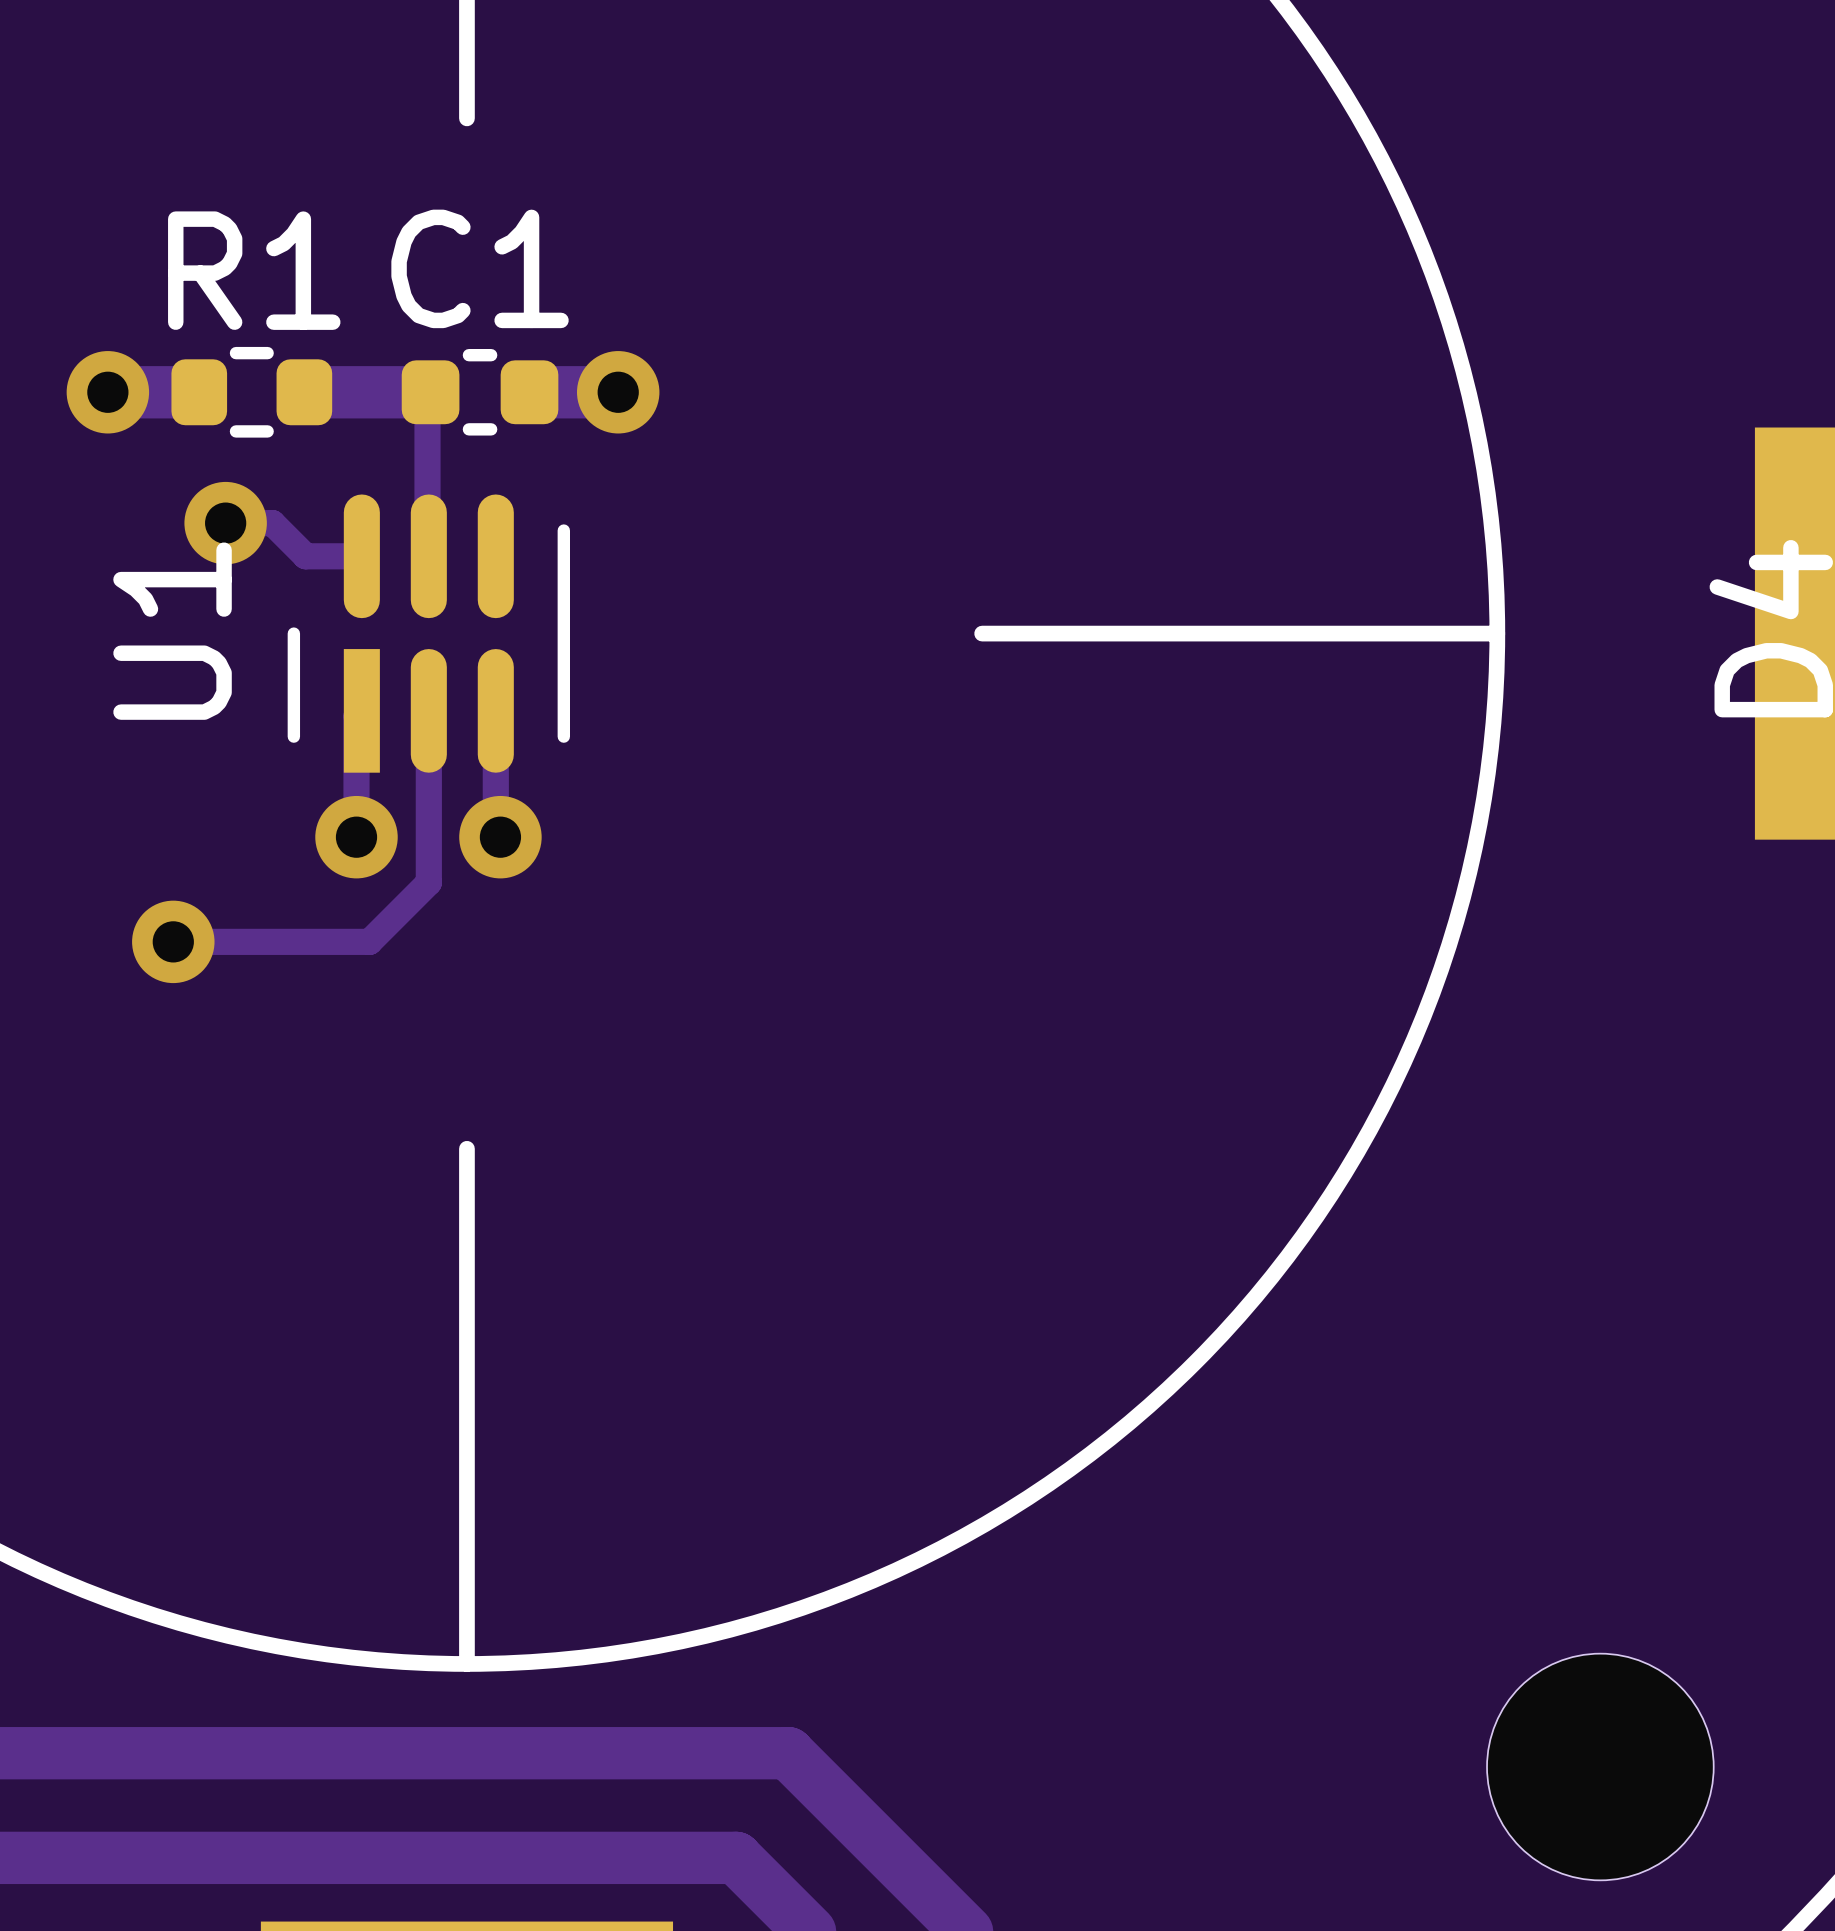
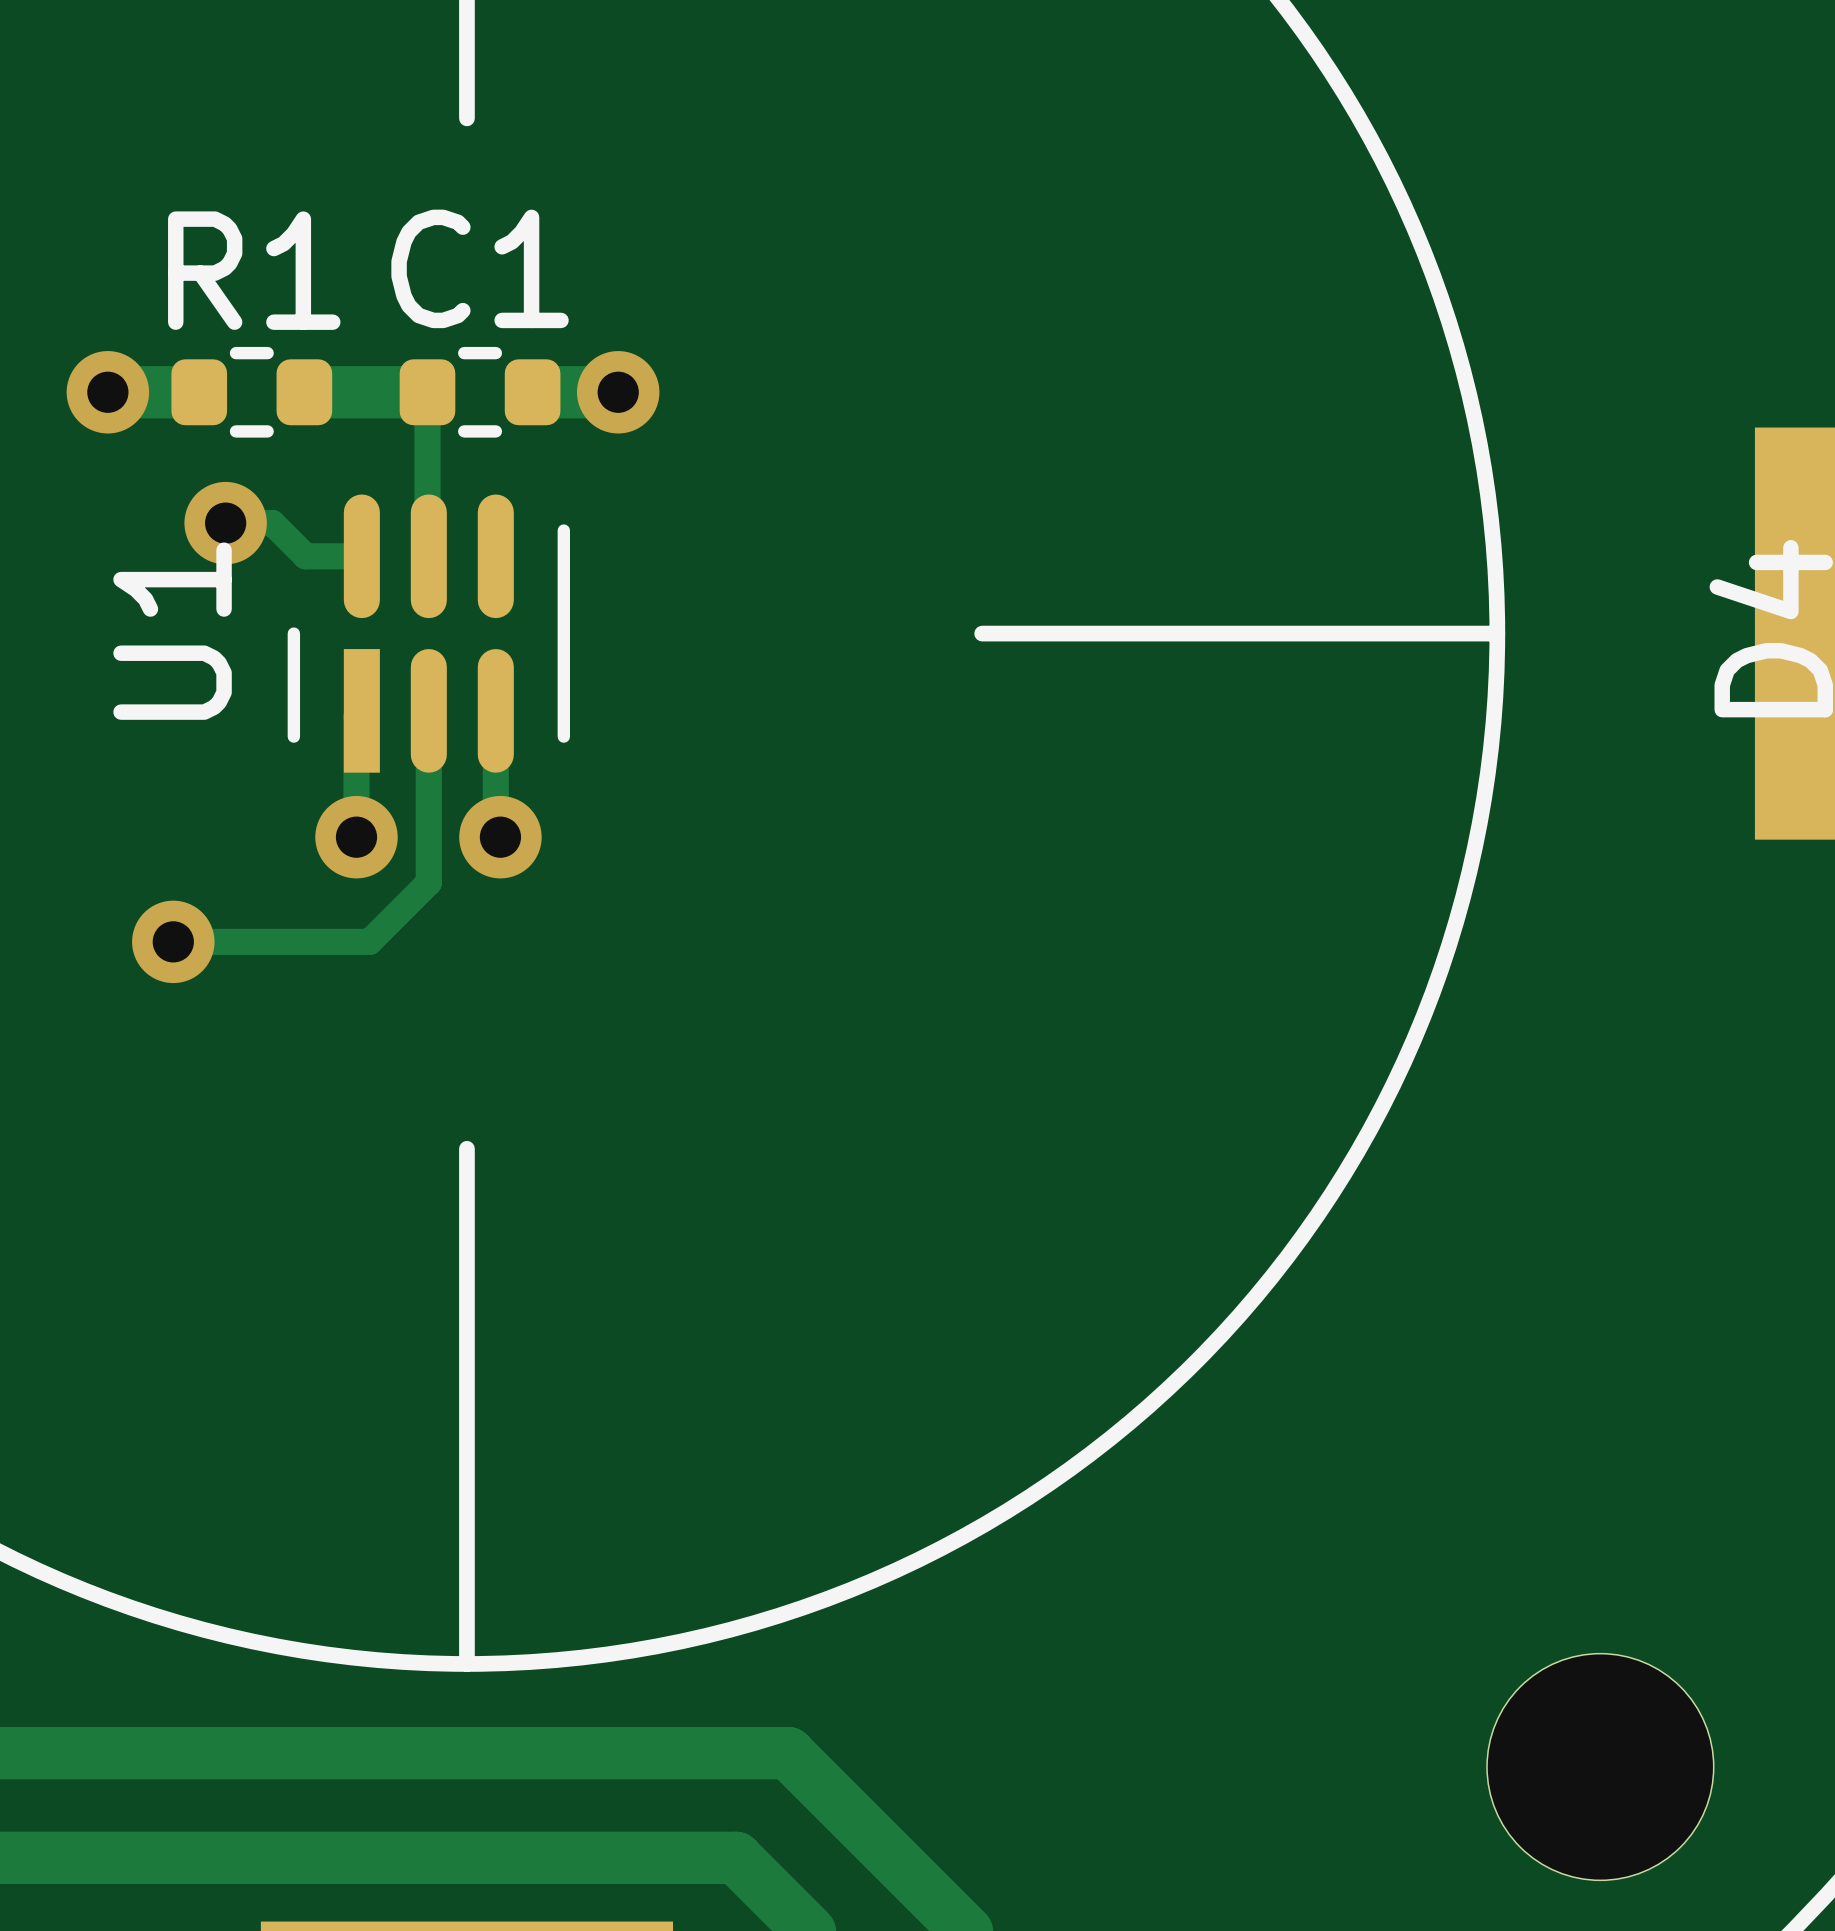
C1 footprint: [401, 349, 559, 436] -> [399, 346, 561, 438]

